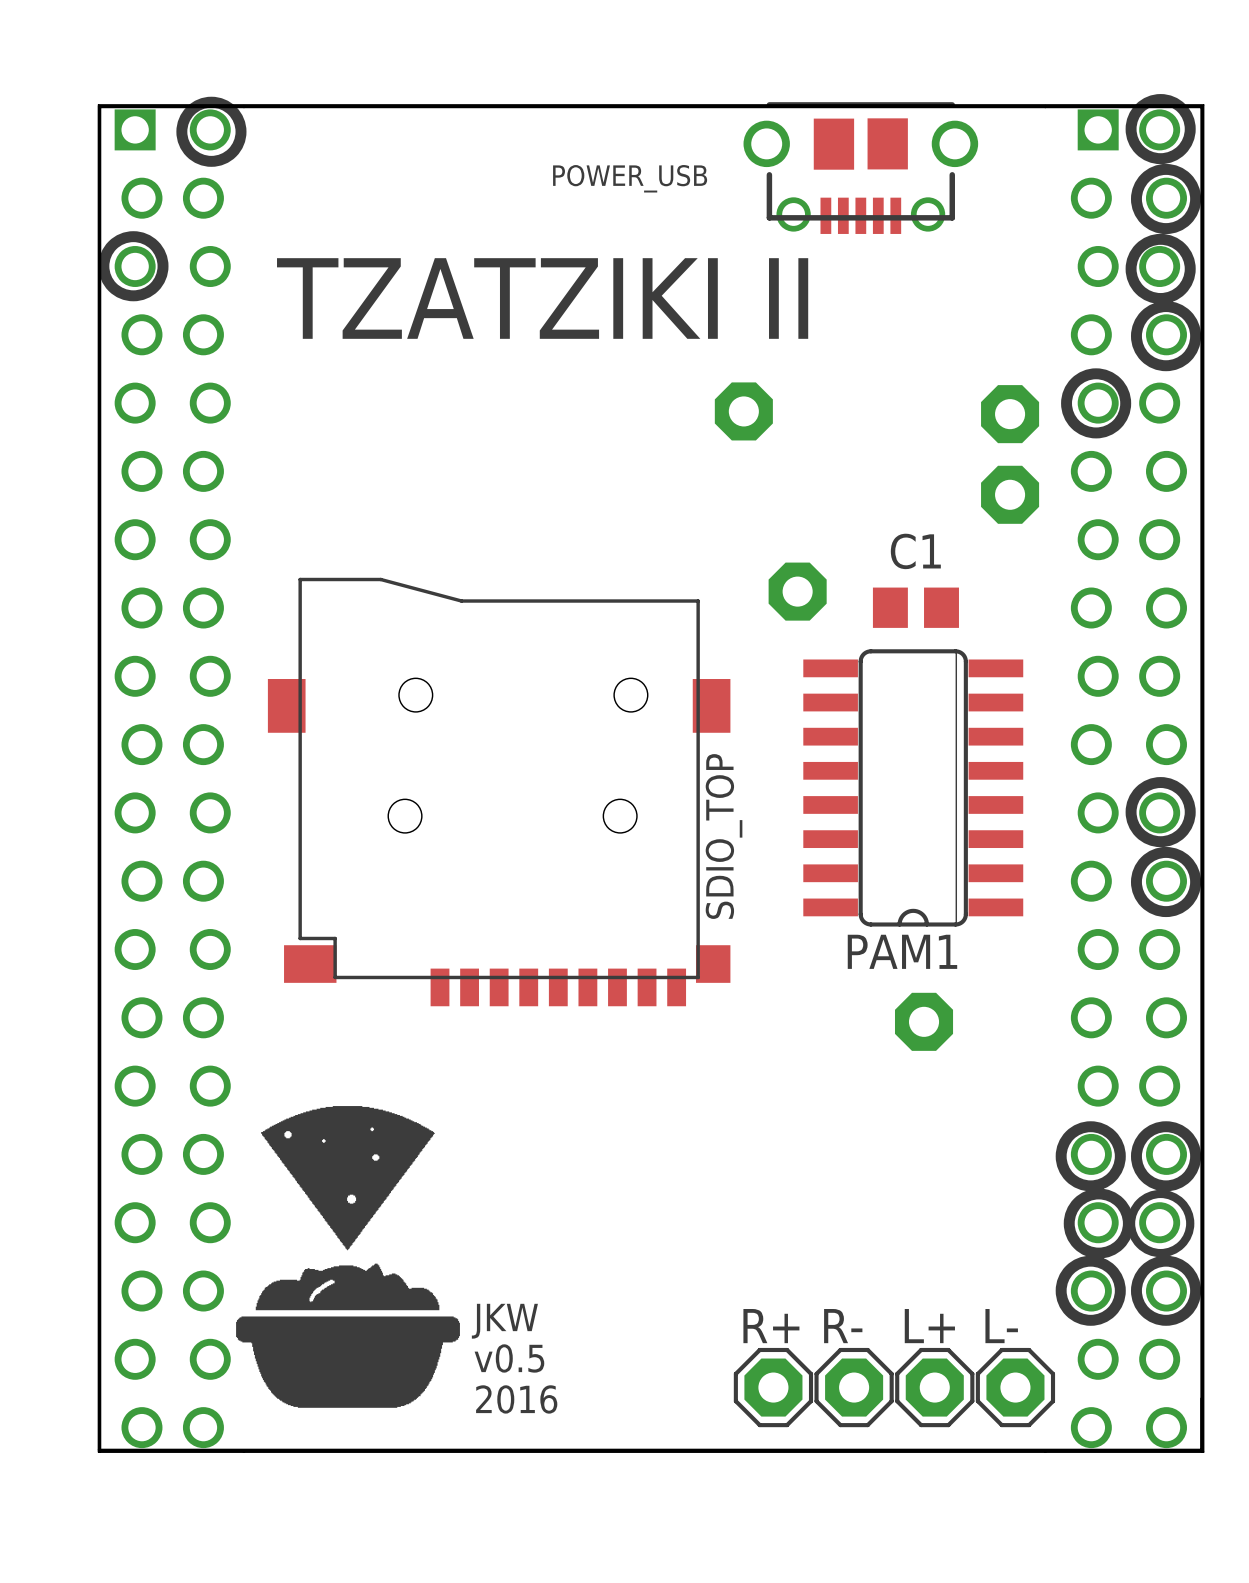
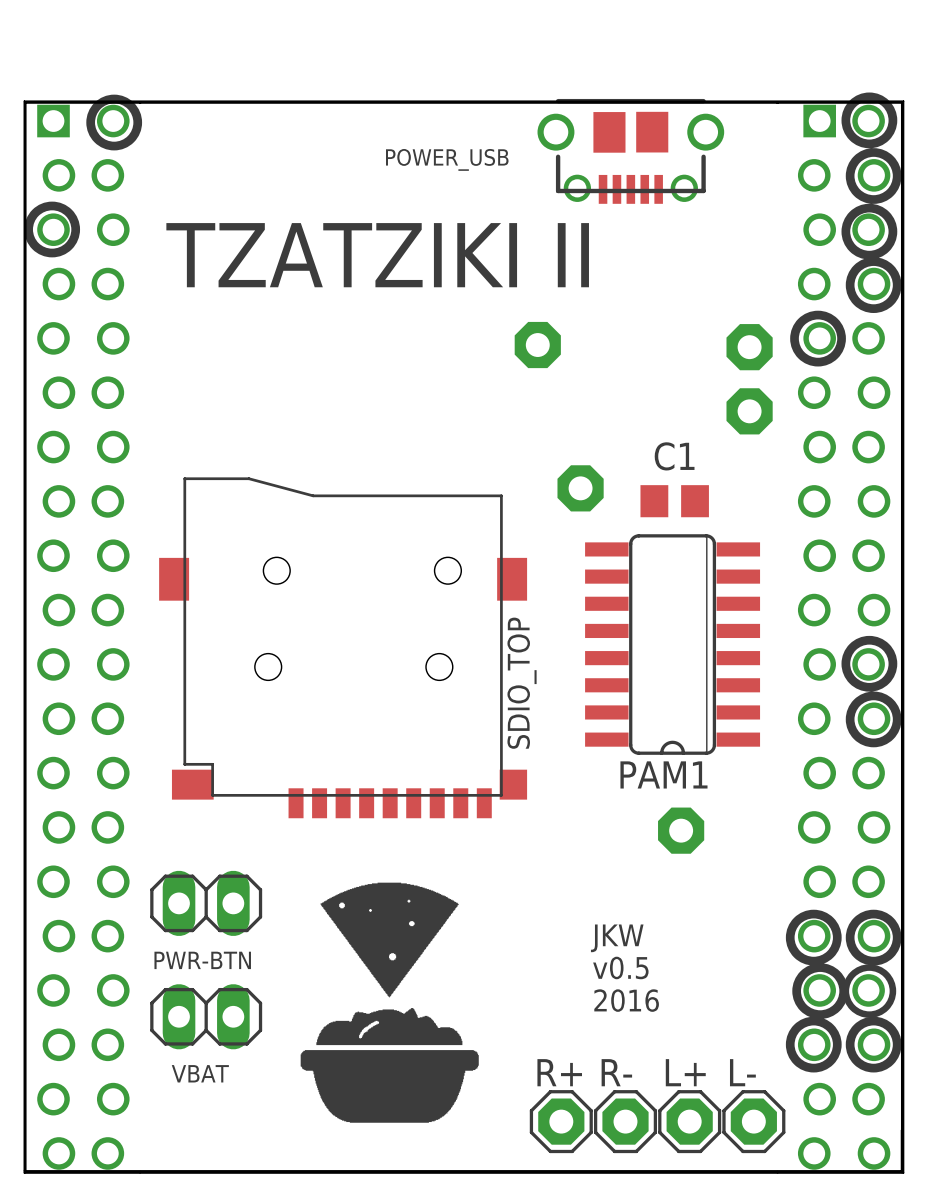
PWR-BTN: none -> (206, 903)
VBAT: none -> (206, 1016)
drawing position: (348, 1256) -> (389, 1002)
text position: JKW (504, 1321) -> JKW (617, 938)
text position: v0.5 (509, 1358) -> v0.5 (620, 967)
text position: 2016 (516, 1399) -> 2016 (626, 1000)

